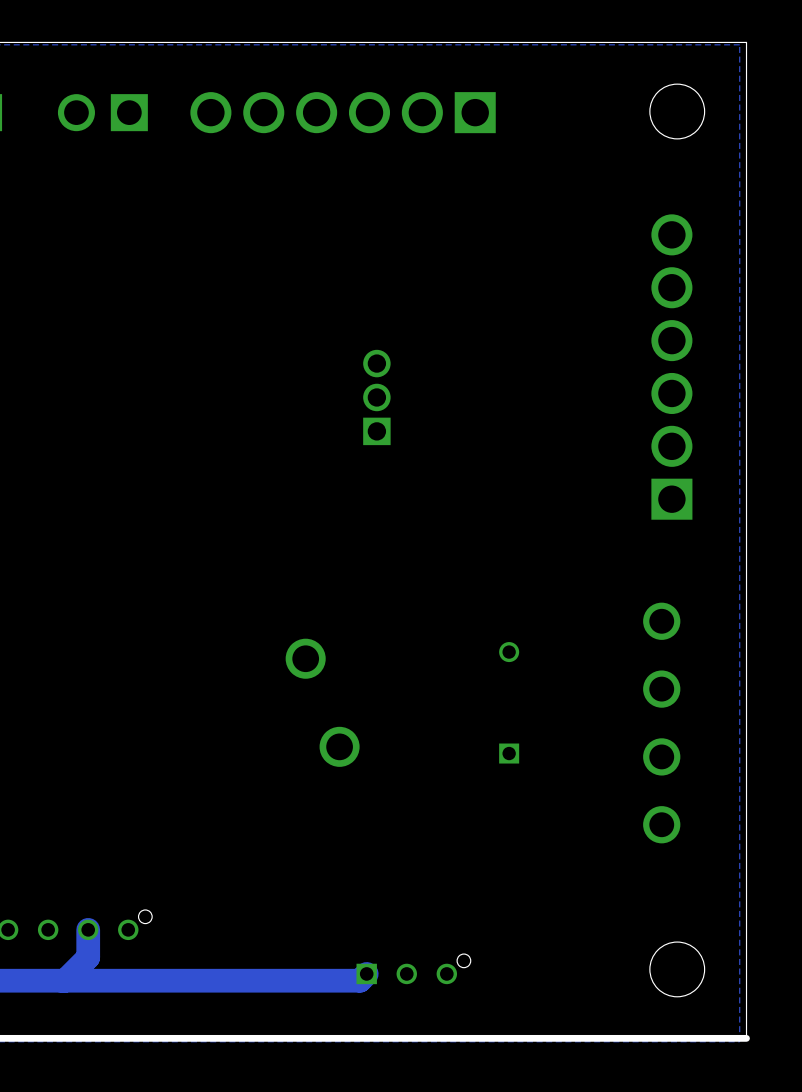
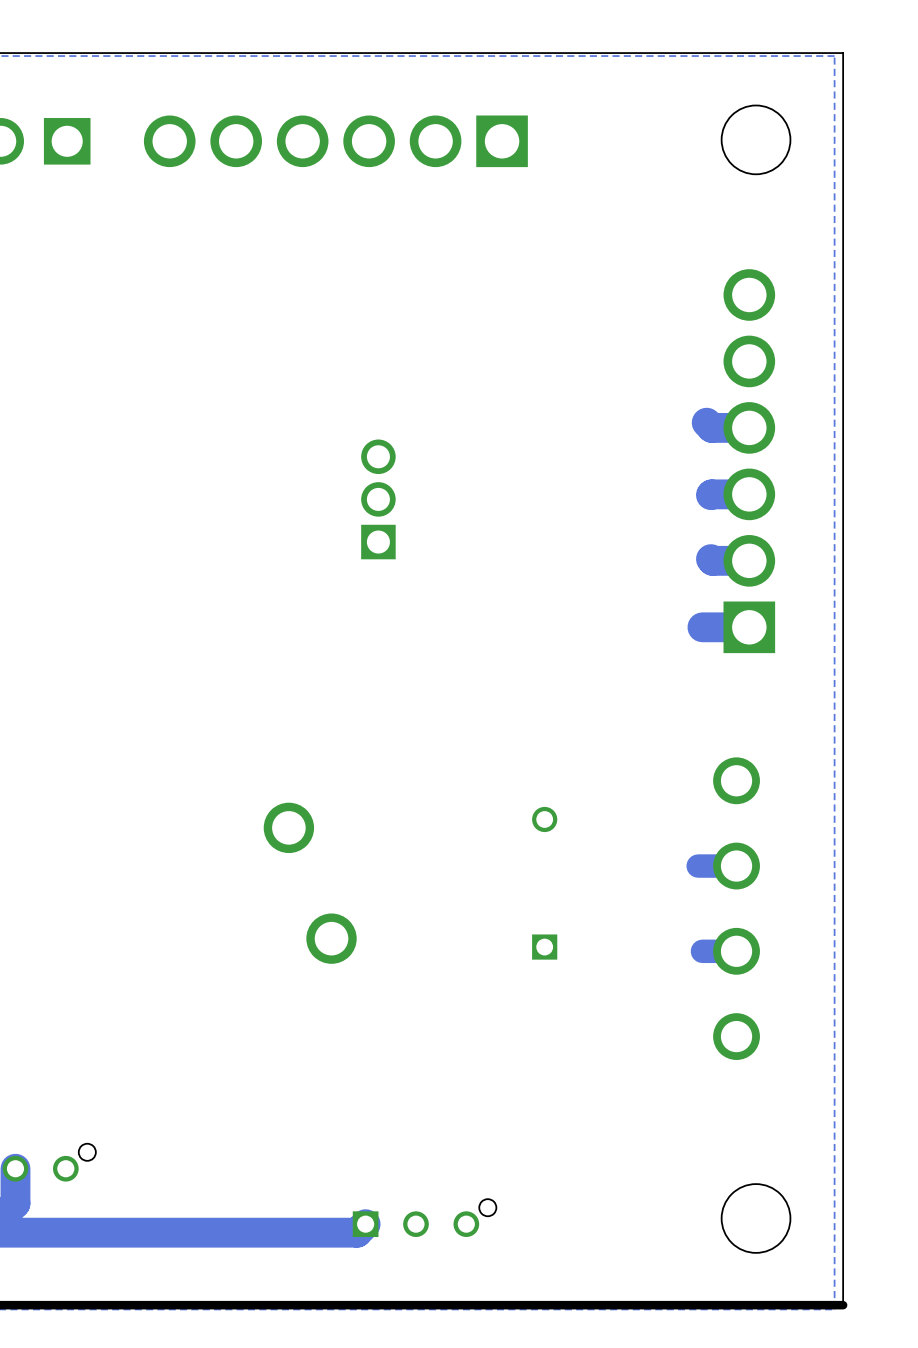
track: none -> (706, 422) (711, 427) (749, 427)
track: none -> (749, 494) (710, 495)
track: none -> (710, 559) (712, 560) (749, 560)
track: none -> (749, 627) (702, 627)
track: none -> (736, 866) (698, 866)
track: none -> (736, 951) (702, 951)

